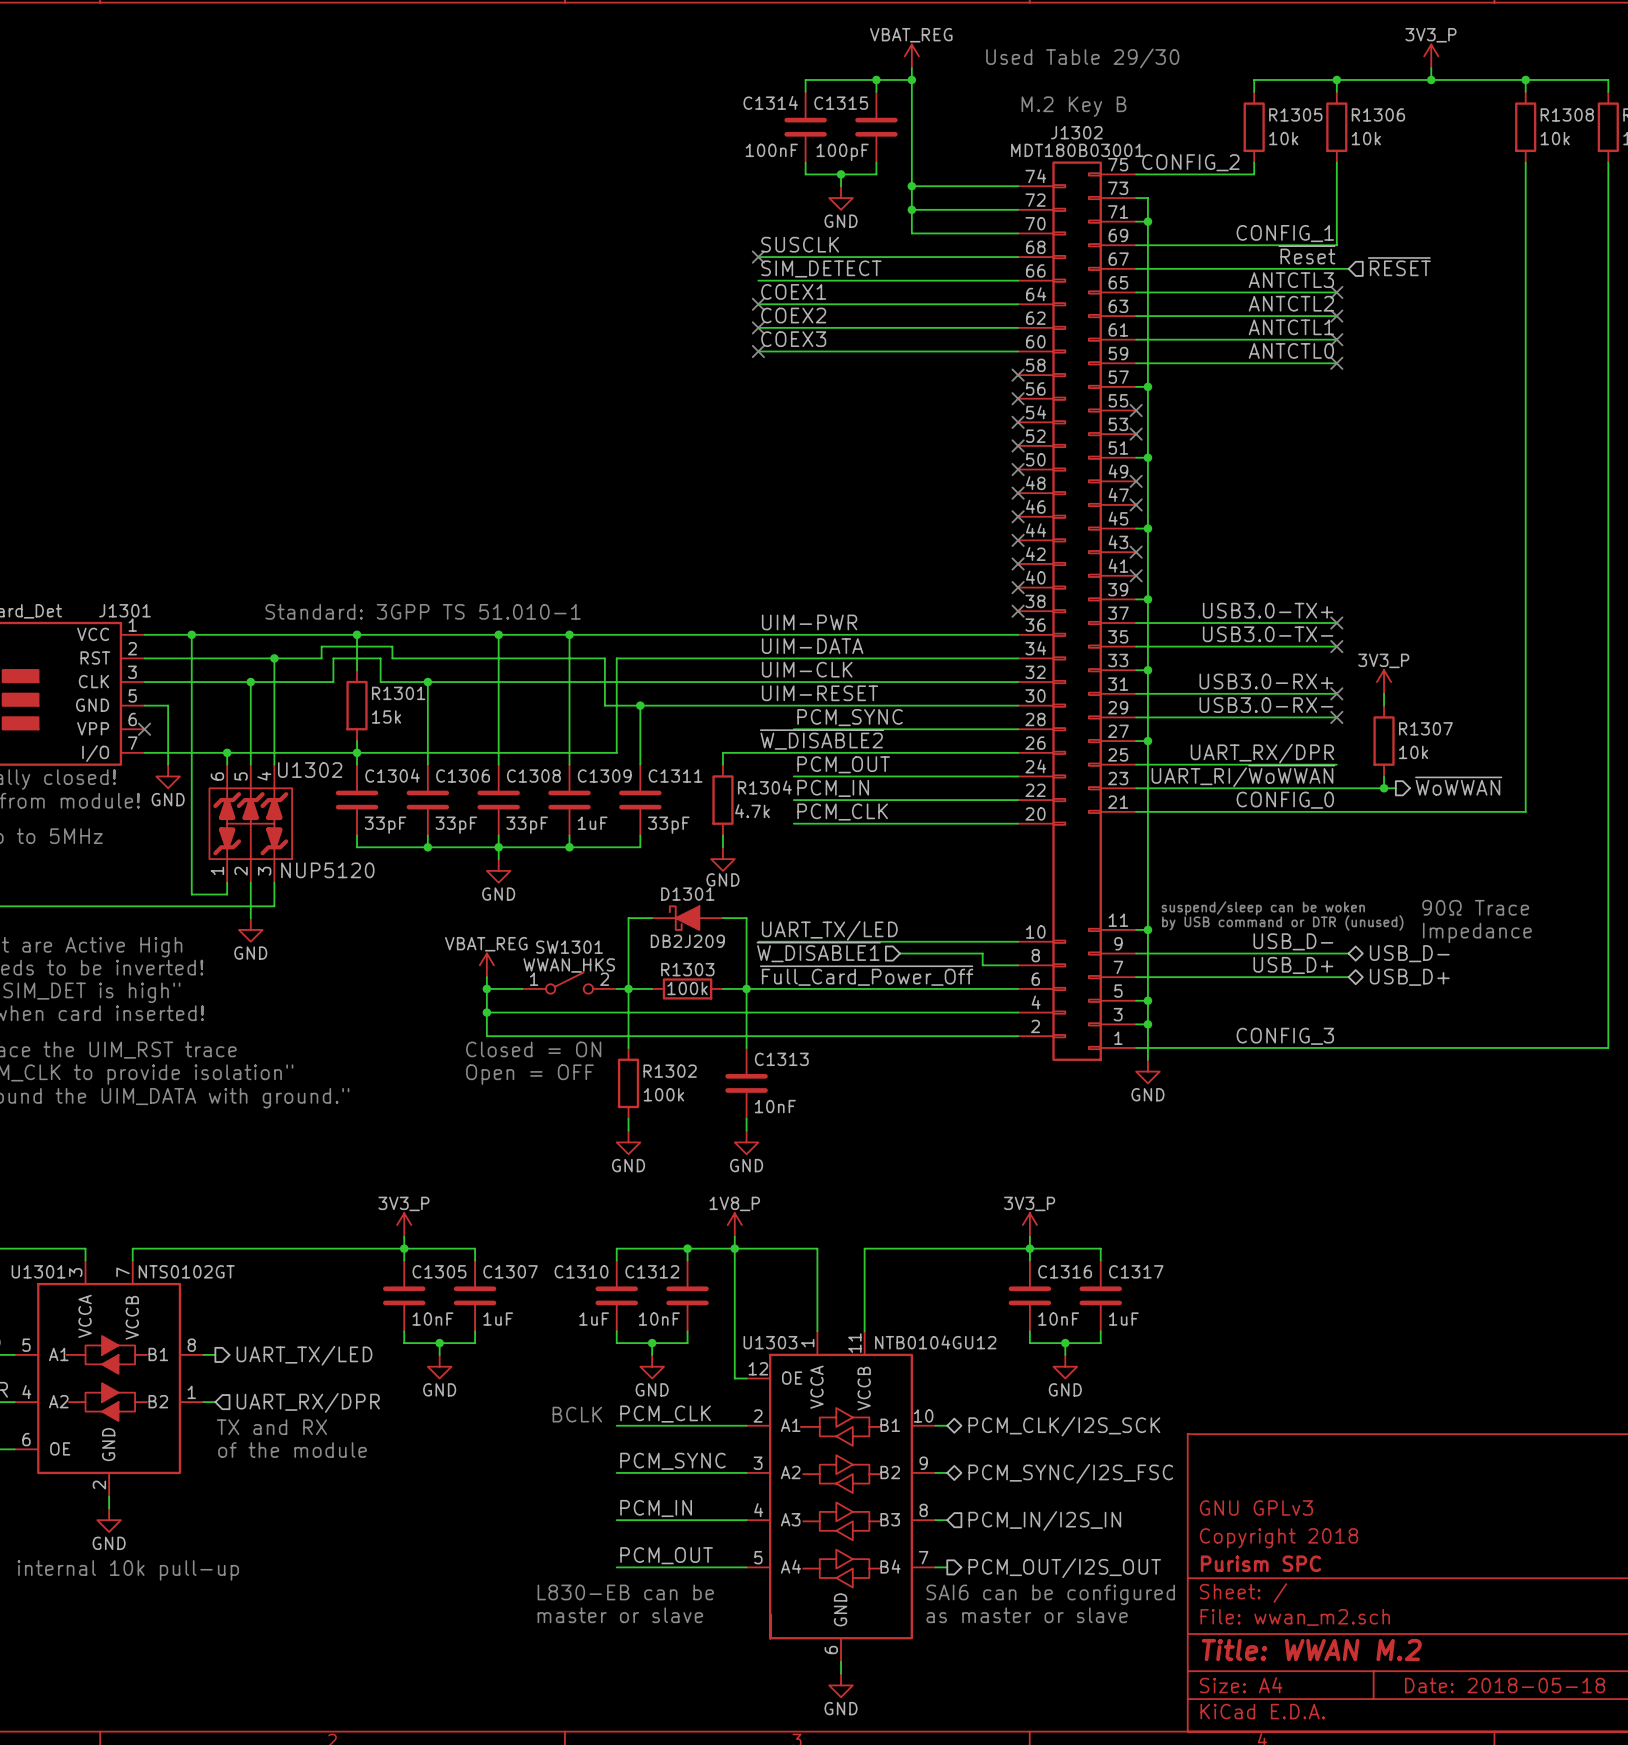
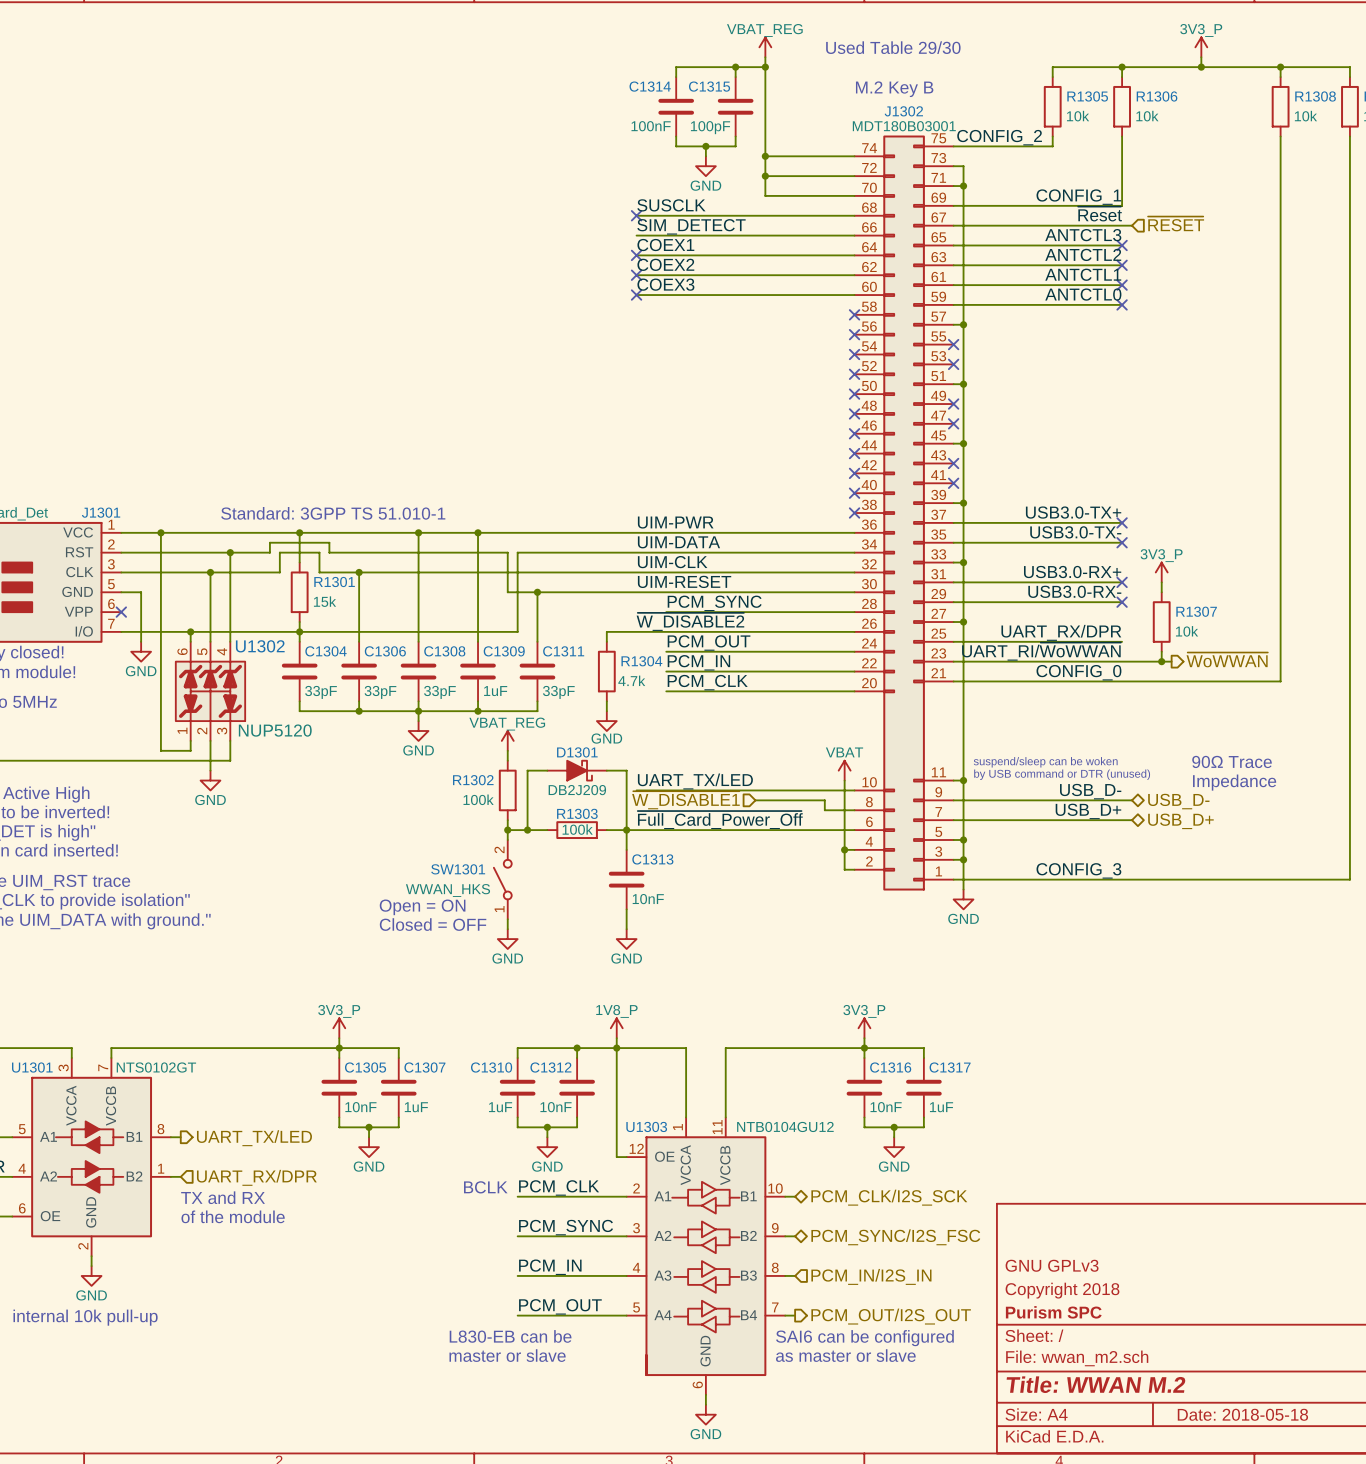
wire: none -> (507, 750) (507, 760)
D1301 rotation: 0° (684, 918) -> 180° (579, 770)
power symbol: none -> VBAT (844, 770)
SW1301 name position: SW1301 (569, 947) -> SW1301 (458, 869)
power symbol position: VBAT_REG (486, 965) -> VBAT_REG (507, 740)
SW1301 value position: WWAN_HKS (569, 965) -> WWAN_HKS (447, 890)
wire: (486, 977) (486, 1036) (1006, 1036) -> (844, 780) (844, 869)
wire: none -> (507, 820) (507, 840)
SW1301 rotation: 0° (569, 983) -> 90° counterclockwise (502, 879)
SW1301 position: (569, 983) -> (502, 879)
wire: (486, 988) (522, 988) -> none
junction: (486, 988) -> none
junction: none -> (507, 830)
wire: (628, 988) (628, 1047) -> none
wire: (486, 1012) (1006, 1012) -> none
junction: (486, 1012) -> none
junction: none -> (844, 849)
text: Closed = ON (533, 1049) -> none
R1302 name position: R1302 (670, 1071) -> R1302 (473, 780)
text: Open = OFF (529, 1074) -> Open = ON (422, 907)
R1302 position: (628, 1083) -> (507, 790)
C1313 position: (746, 1083) -> (626, 879)
R1302 value position: 100k (663, 1094) -> 100k (478, 799)
text: none -> Closed = OFF (433, 924)
wire: (628, 1118) (628, 1130) -> (507, 919) (507, 929)
wire: (746, 1118) (746, 1130) -> none
power symbol position: GND (628, 1142) -> GND (507, 939)
power symbol position: GND (746, 1142) -> GND (626, 939)

